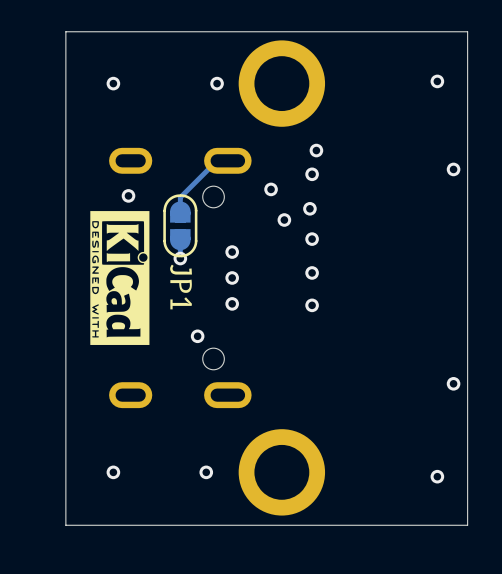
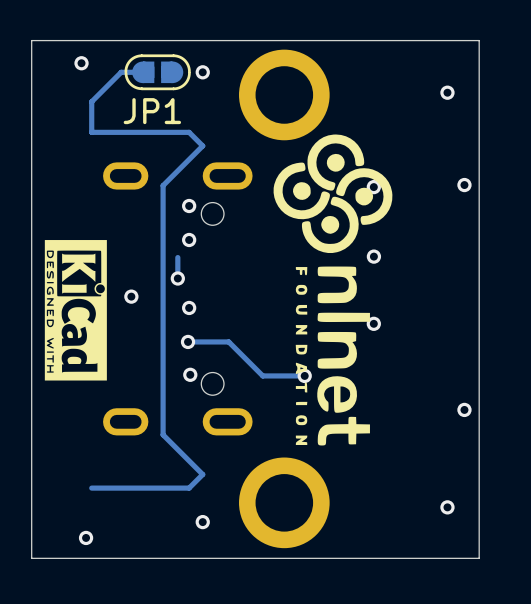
board edge: (65, 31) (65, 525) -> (57, 40) (31, 40) (31, 558) (57, 558)
track: none -> (144, 72) (121, 72) (91, 101) (91, 132) (189, 132) (202, 145) (163, 185) (163, 434) (202, 474) (189, 488) (91, 488)
via position: (113, 83) -> (81, 63)
via position: (217, 83) -> (202, 72)
drawing: none -> [273, 134, 393, 446]
via: (316, 150) -> none
track: (227, 160) (217, 160) (180, 197) (180, 213) -> none
via: none -> (373, 187)
via: (312, 174) -> none
via: none -> (189, 206)
via: (271, 189) -> none
via: (128, 195) -> none
via: (309, 208) -> none
via: (284, 220) -> none
via: none -> (189, 239)
JP1 rotation: 0° (180, 225) -> 90° counterclockwise (157, 72)
JP1 position: (180, 225) -> (157, 72)
via: none -> (373, 256)
via: (312, 239) -> none
via: (232, 252) -> none
via: (312, 272) -> none
via: none -> (131, 296)
via: (232, 277) -> none
drawing position: (119, 278) -> (75, 310)
via: none -> (189, 307)
via: none -> (373, 323)
via: (232, 303) -> none
via: (312, 305) -> none
track: none -> (188, 341) (228, 341) (262, 375) (304, 375)
via: none -> (188, 341)
via: (197, 336) -> none
via: none -> (190, 374)
via: none -> (304, 375)
via position: (113, 472) -> (86, 537)
via position: (206, 472) -> (202, 522)

